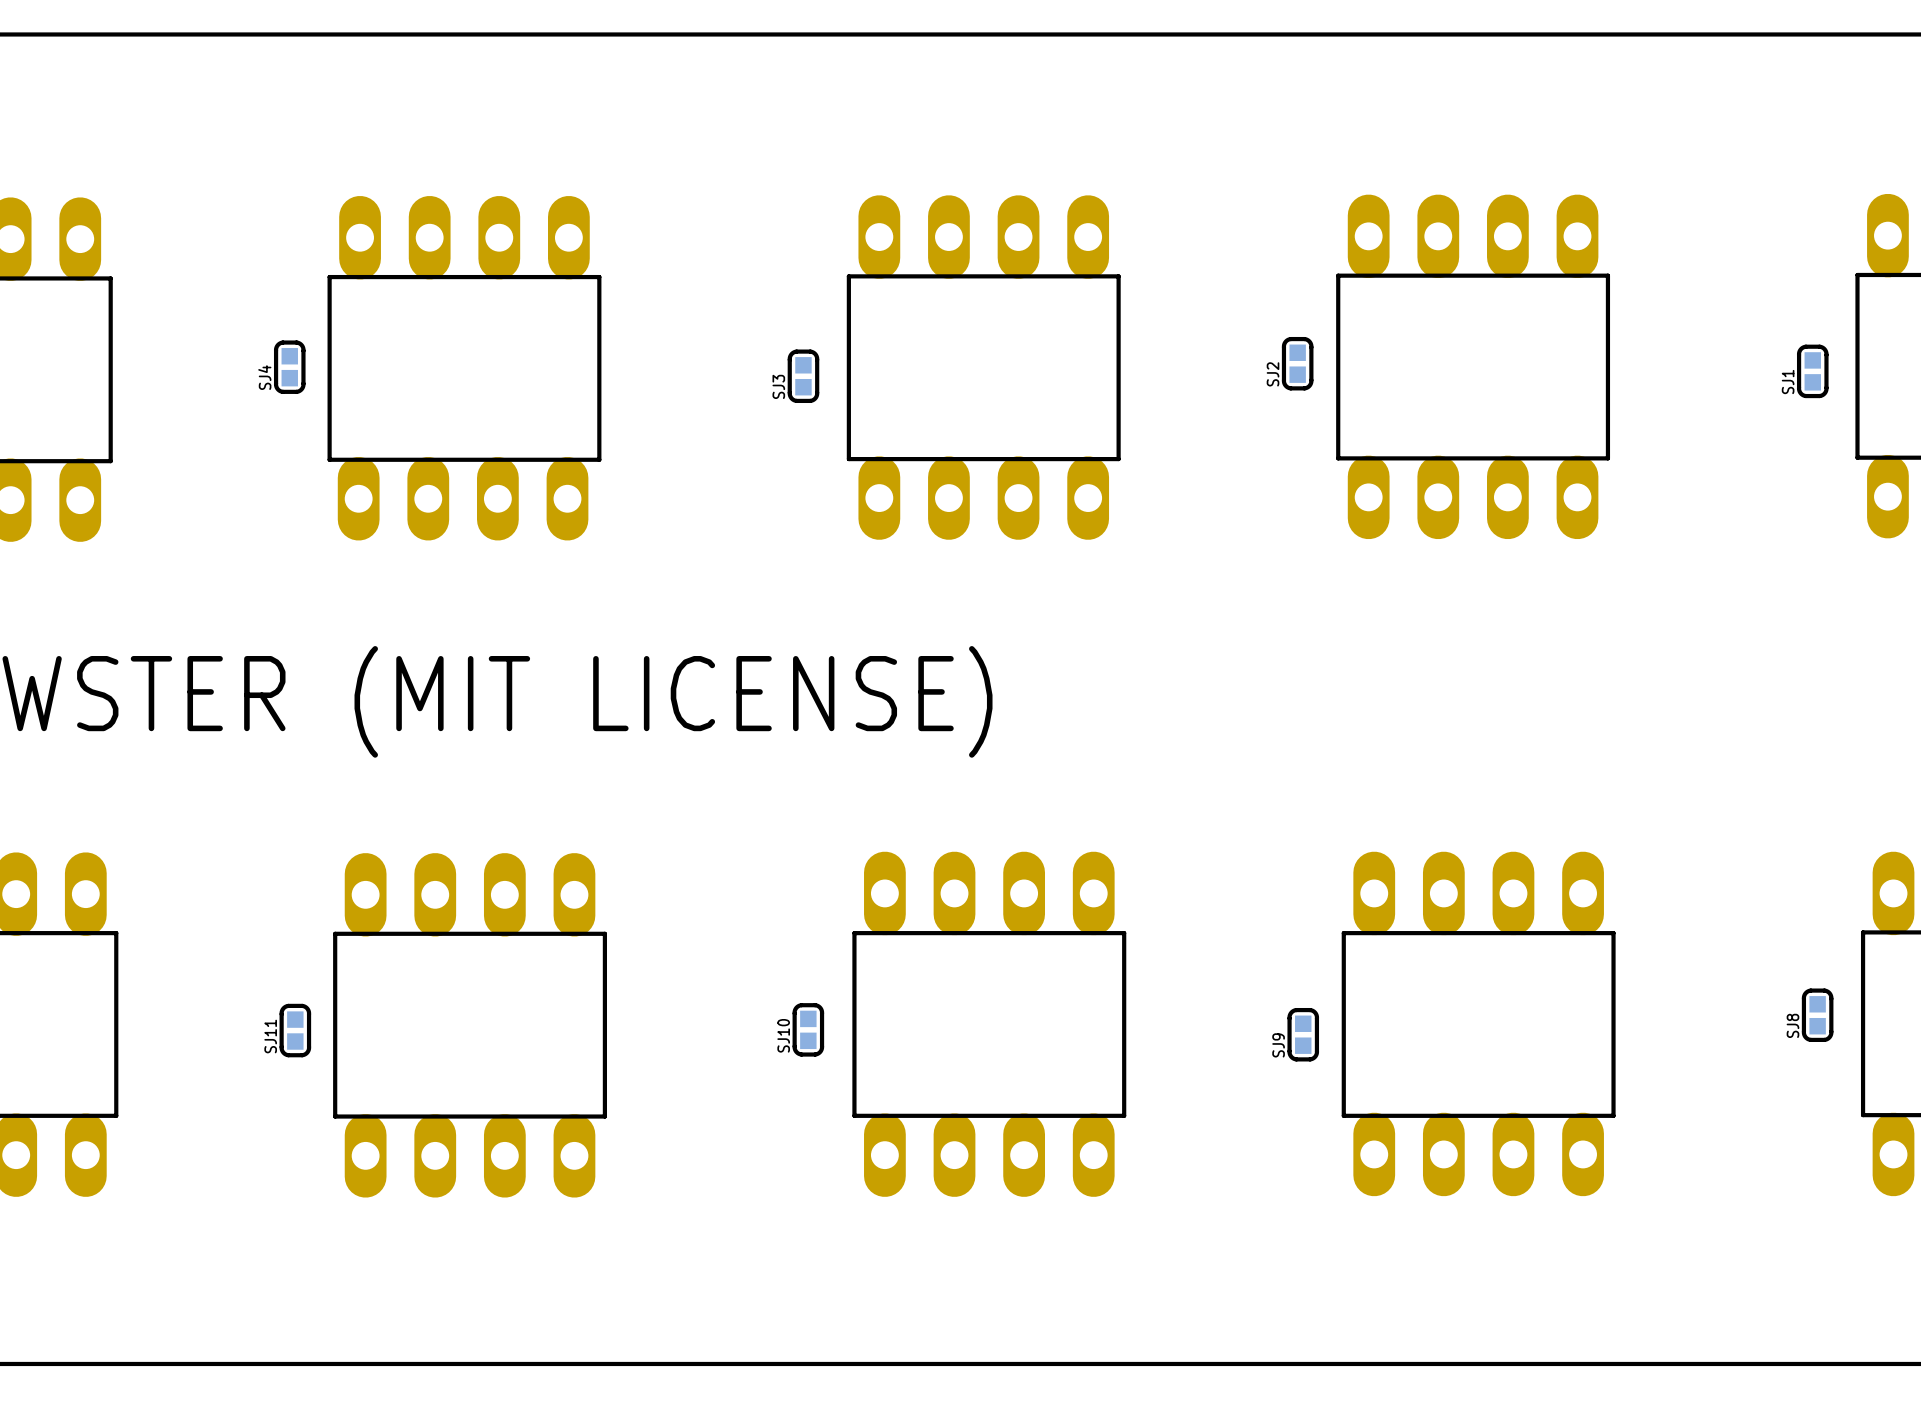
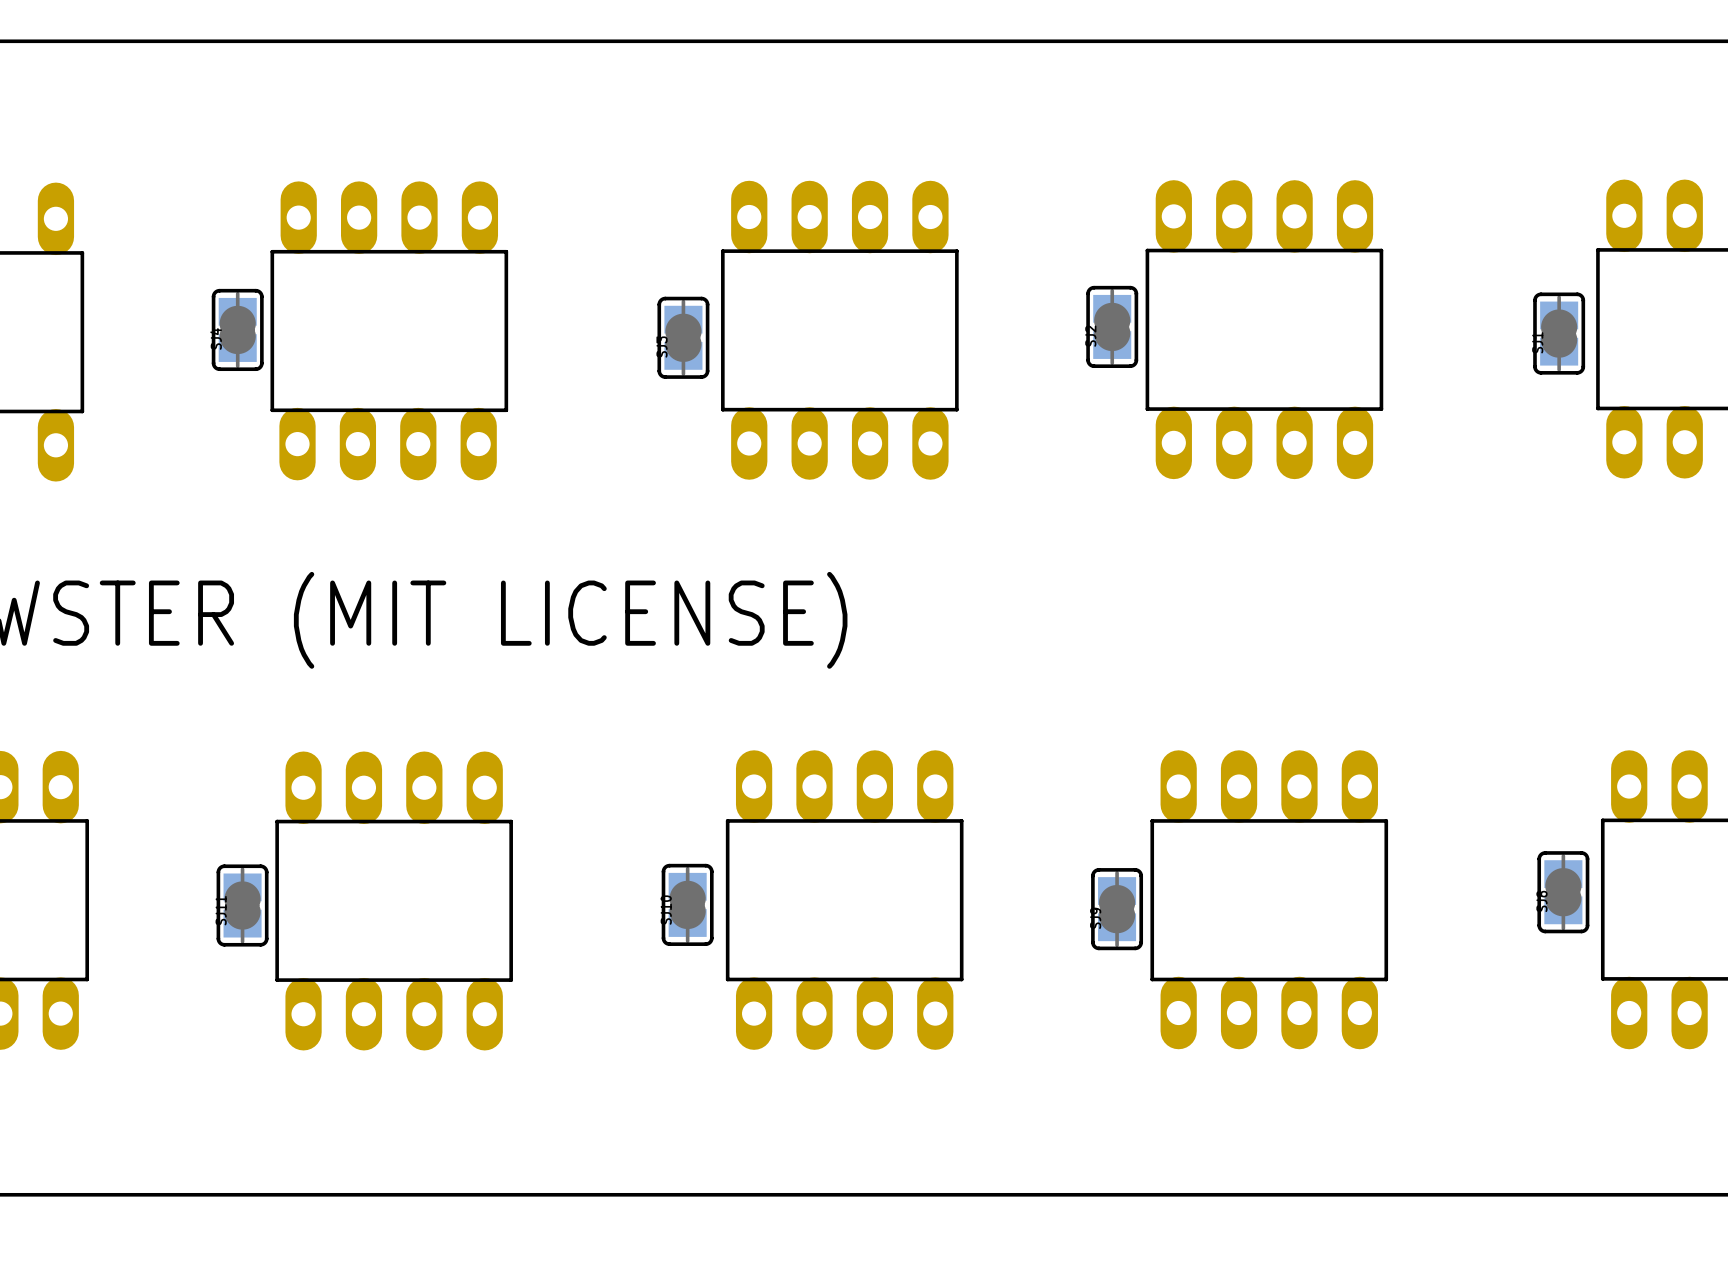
SJ2 footprint: [1281, 336, 1314, 391] -> [1086, 285, 1139, 369]
SJ4 footprint: [273, 340, 306, 394] -> [211, 288, 264, 372]
SJ1 footprint: [1796, 344, 1829, 399] -> [1533, 292, 1586, 375]
SJ3 footprint: [787, 349, 820, 404] -> [657, 296, 710, 379]
SJ8 footprint: [1801, 988, 1834, 1043] -> [1537, 851, 1590, 934]
SJ11 footprint: [279, 1003, 312, 1058] -> [216, 864, 269, 947]
SJ10 footprint: [792, 1003, 825, 1057] -> [661, 863, 714, 946]
SJ9 footprint: [1287, 1007, 1320, 1062] -> [1091, 868, 1144, 951]

